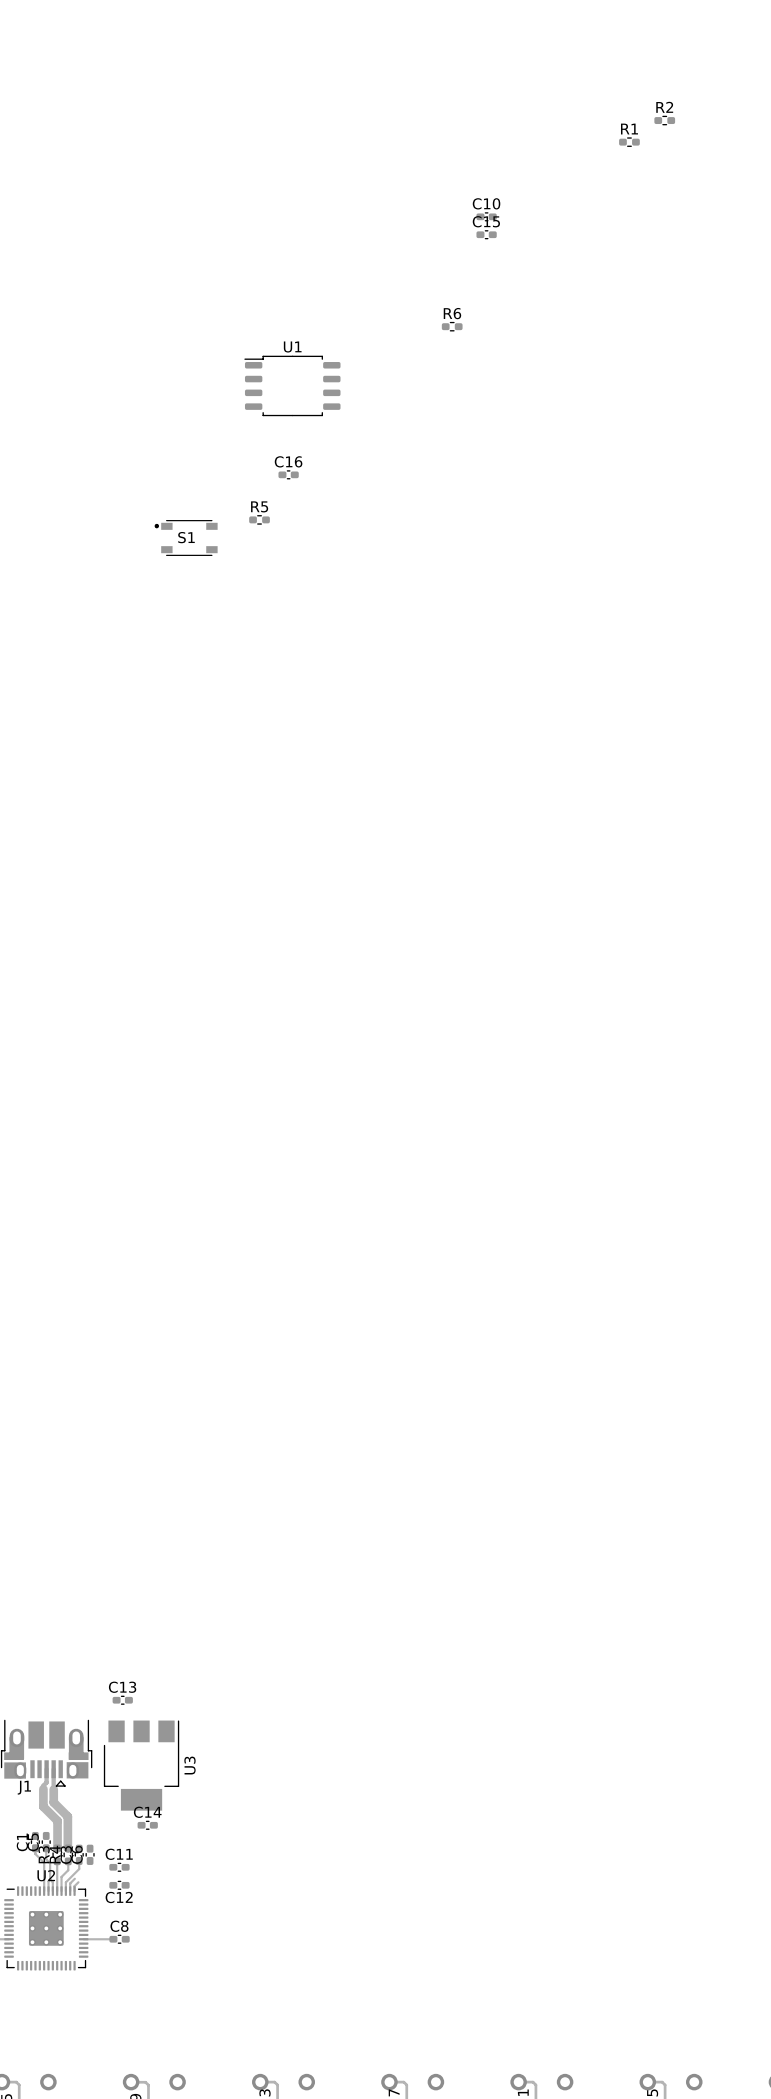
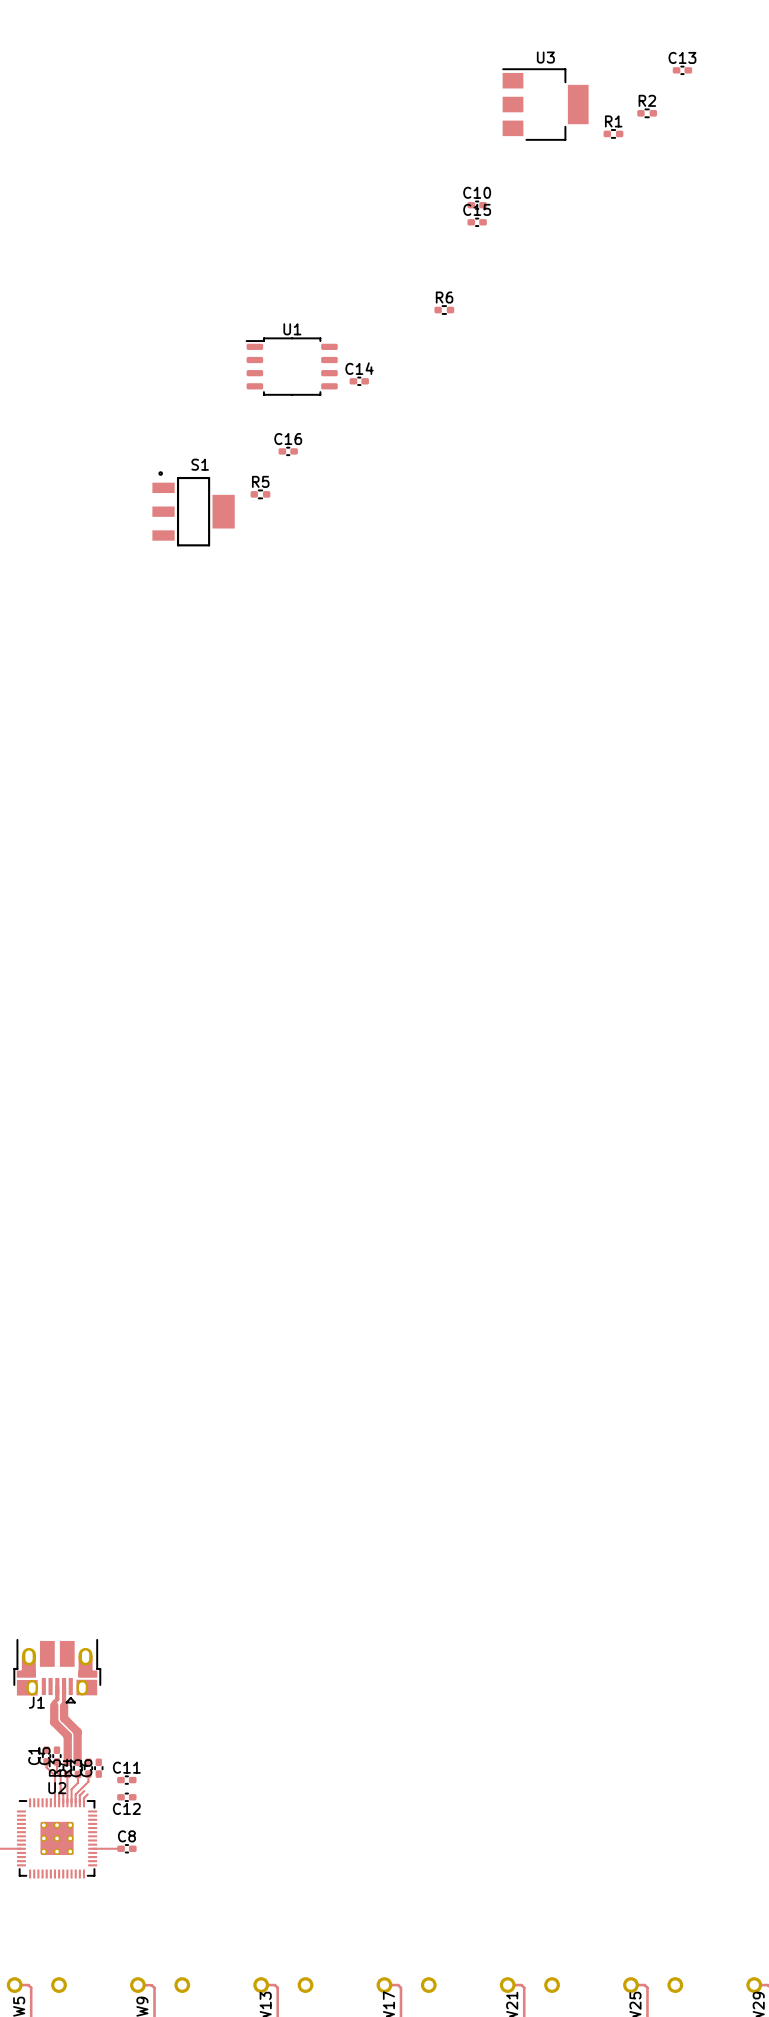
S1 footprint: [154, 520, 218, 556] -> [152, 471, 235, 547]
S1 name position: S1 (186, 537) -> S1 (200, 464)
C13 position: (122, 1700) -> (682, 70)
U3 rotation: 0° (141, 1765) -> 90° counterclockwise (545, 104)
U3 position: (141, 1765) -> (545, 104)
C14 position: (147, 1825) -> (359, 381)

